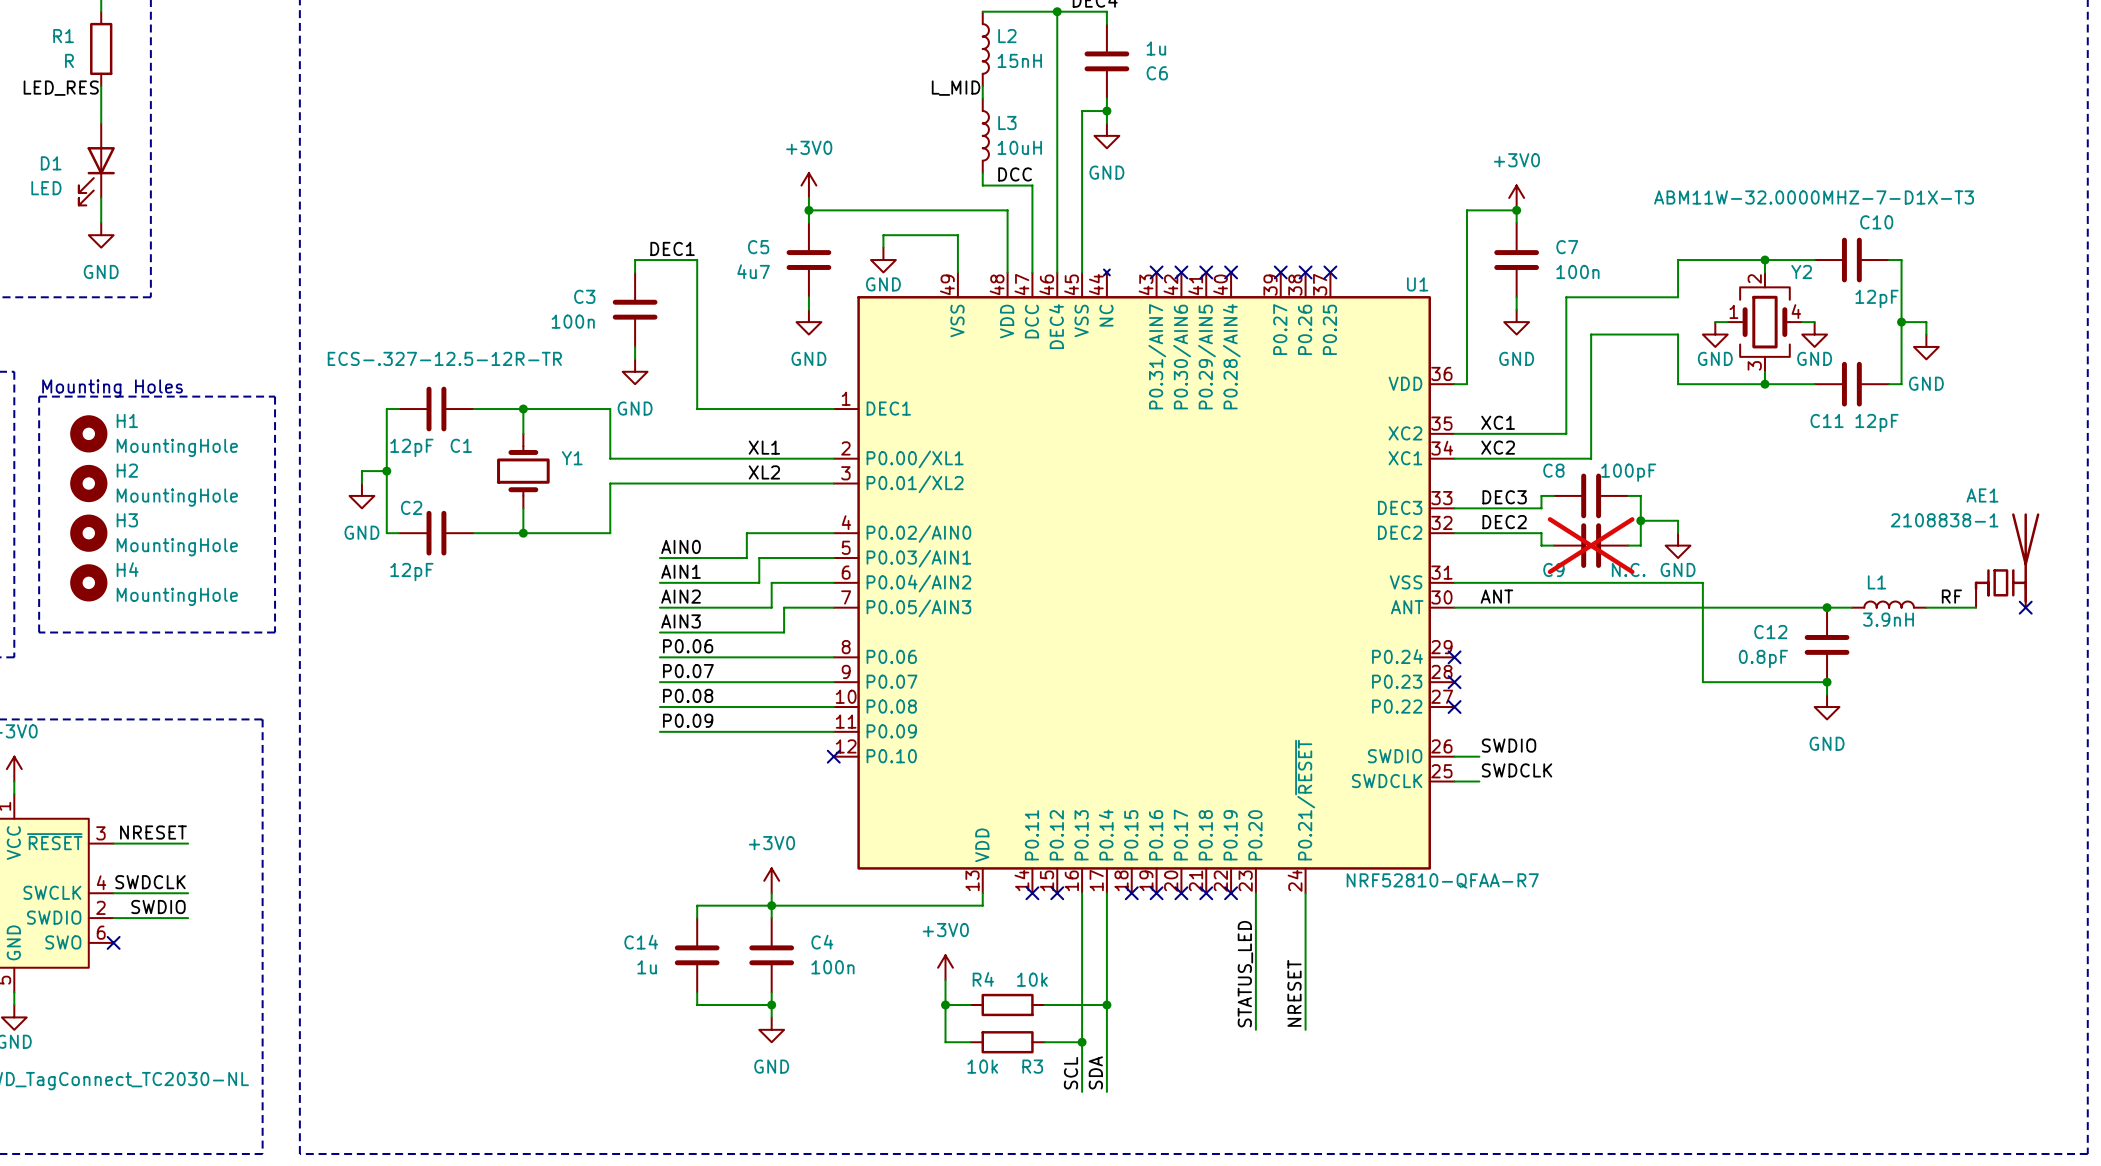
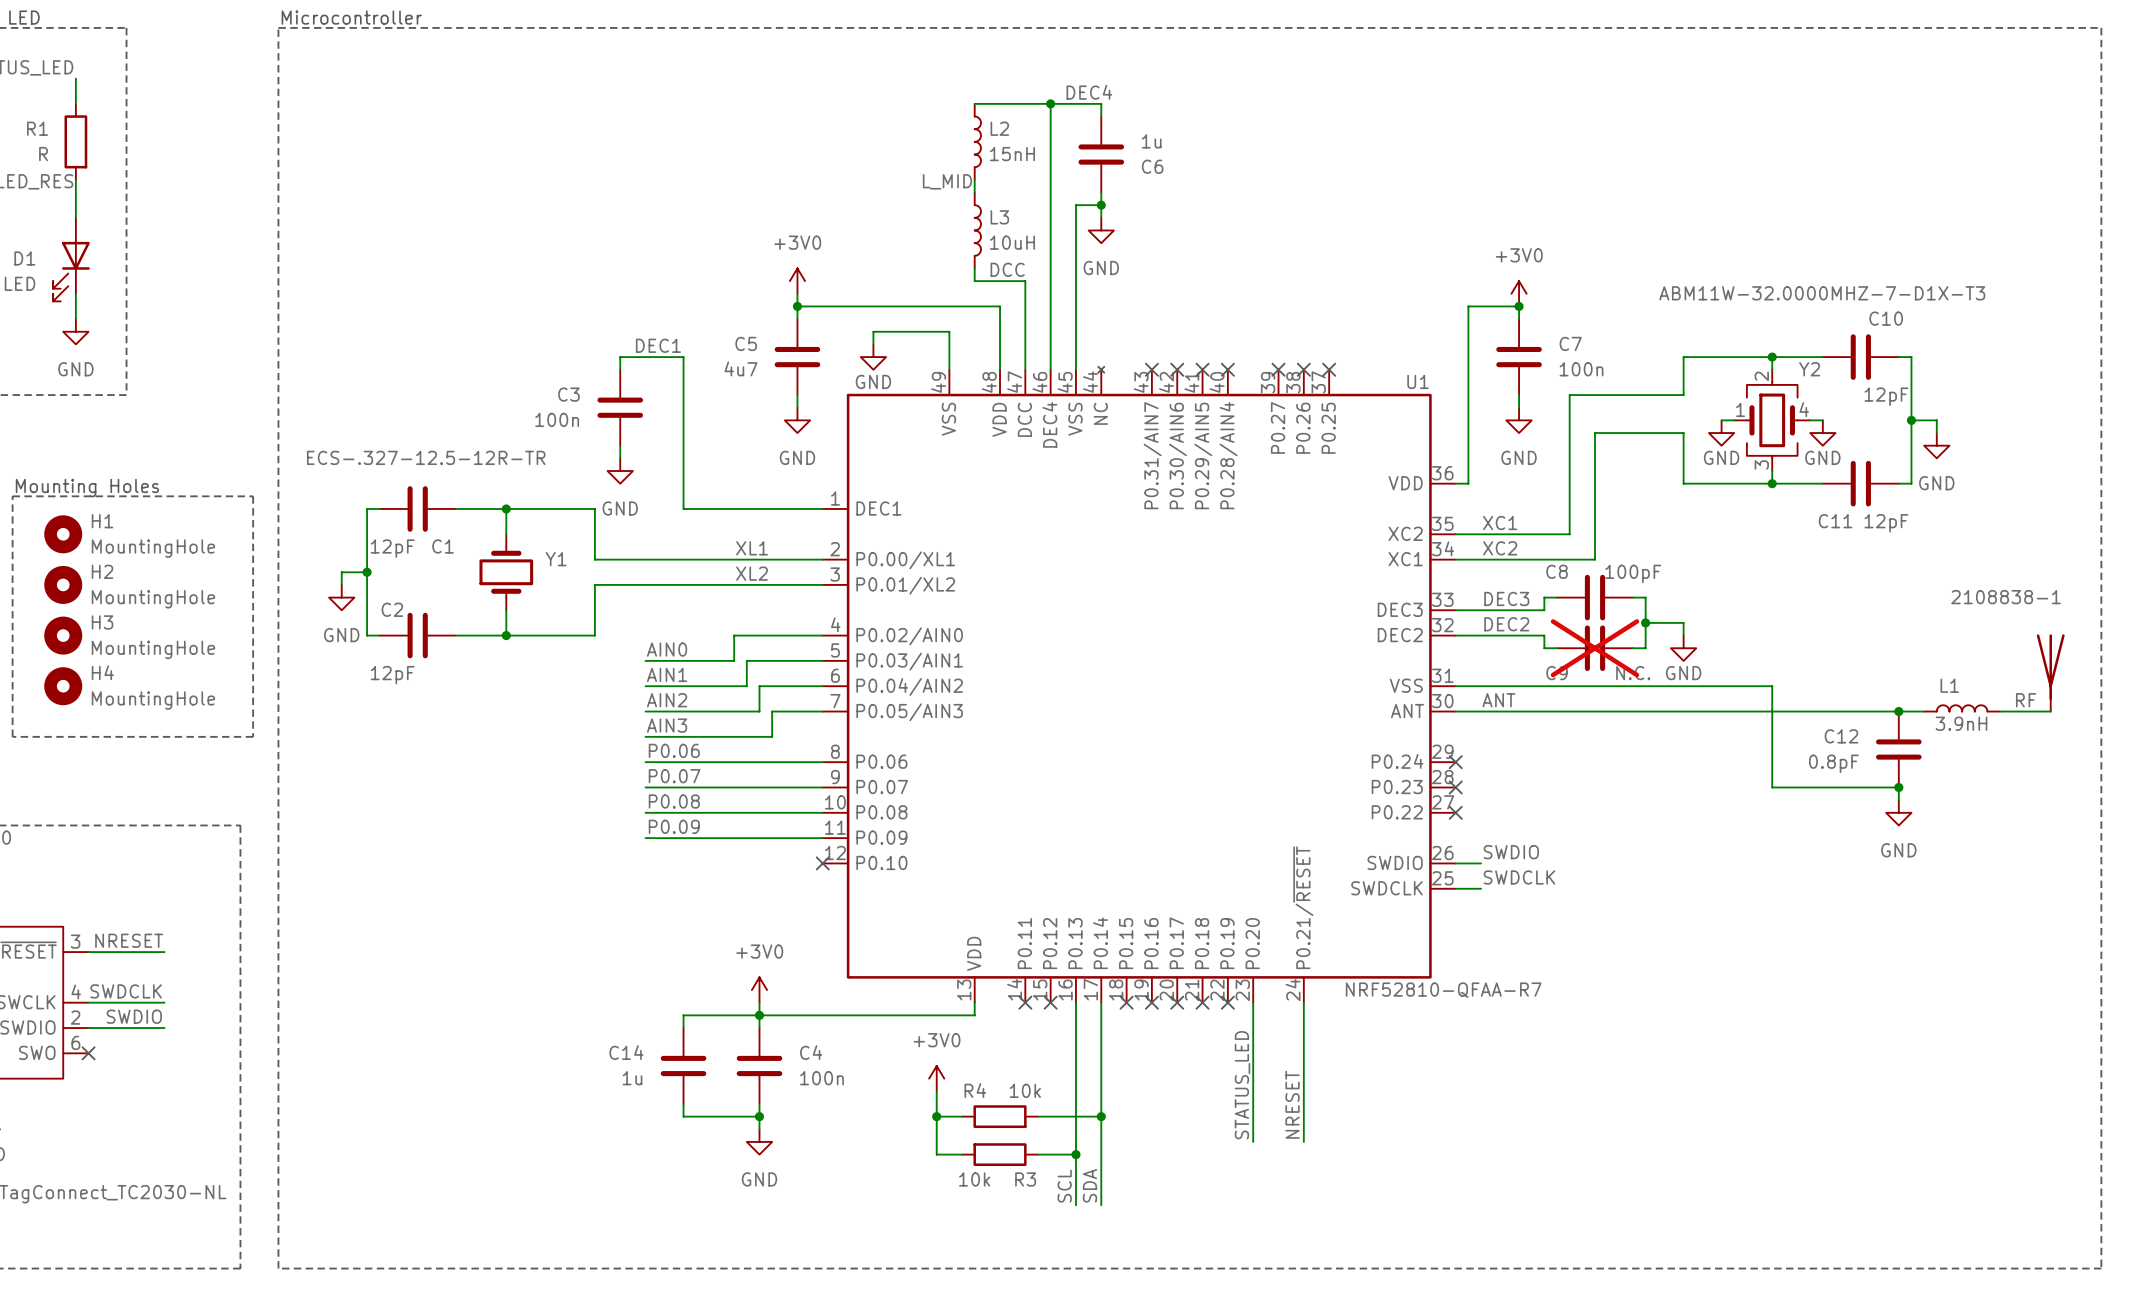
AE1: 2108838-1 (2007, 560) -> none
2108838-1: none -> (2050, 672)
wire: (1702, 582) (1702, 682) (1764, 682) -> (1708, 686) (1772, 686) (1772, 787)
label position: RF (1951, 596) -> RF (2026, 700)
L1 position: (1889, 604) -> (1962, 708)
junction: (1827, 607) -> none
wire: none -> (1860, 711) (1924, 711)
junction: none -> (1898, 711)
wire: (1926, 607) (1976, 607) -> (2000, 711) (2050, 711)
no-connect mark: (2025, 607) -> none
C12 position: (1827, 644) -> (1898, 749)
wire: (1827, 682) (1827, 694) -> (1835, 787) (1898, 787) (1898, 800)
junction: (1827, 682) -> none
junction: none -> (1898, 787)
power symbol position: GND (1827, 707) -> GND (1898, 812)

